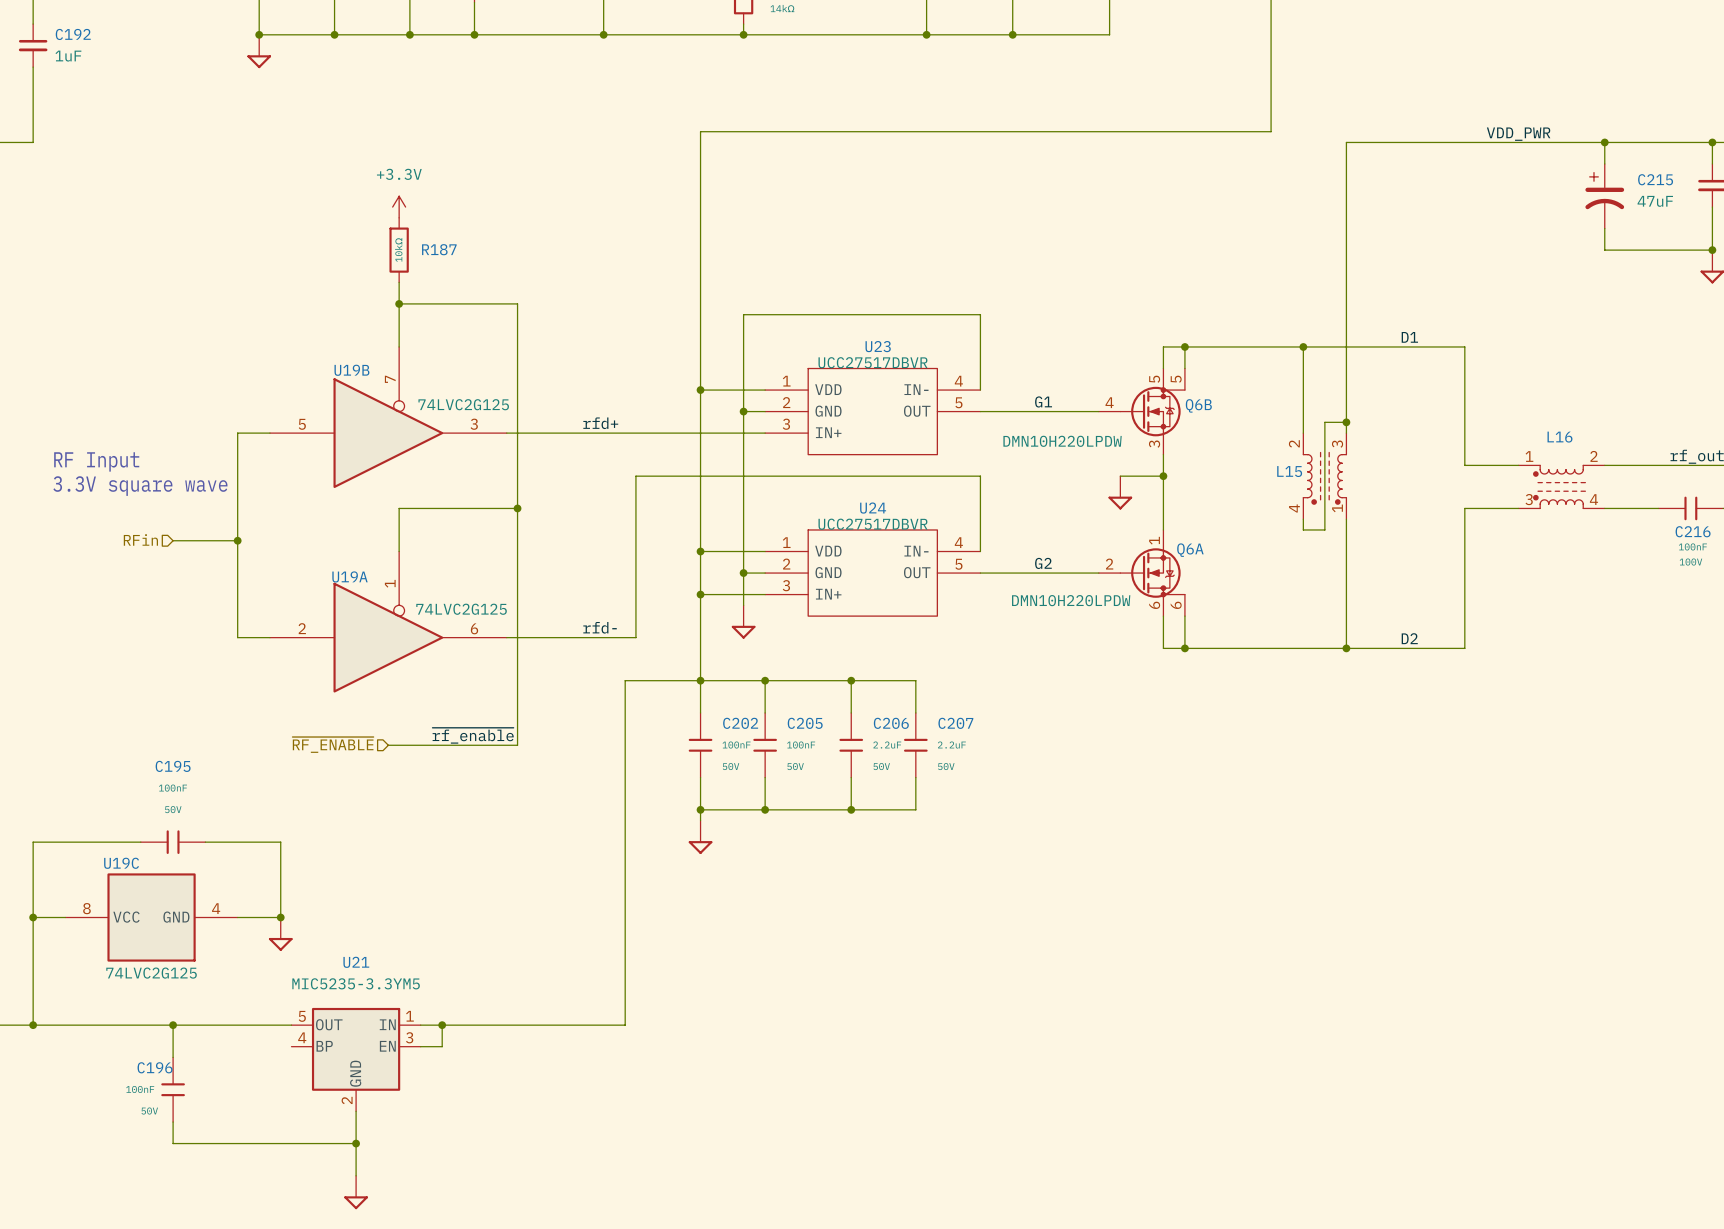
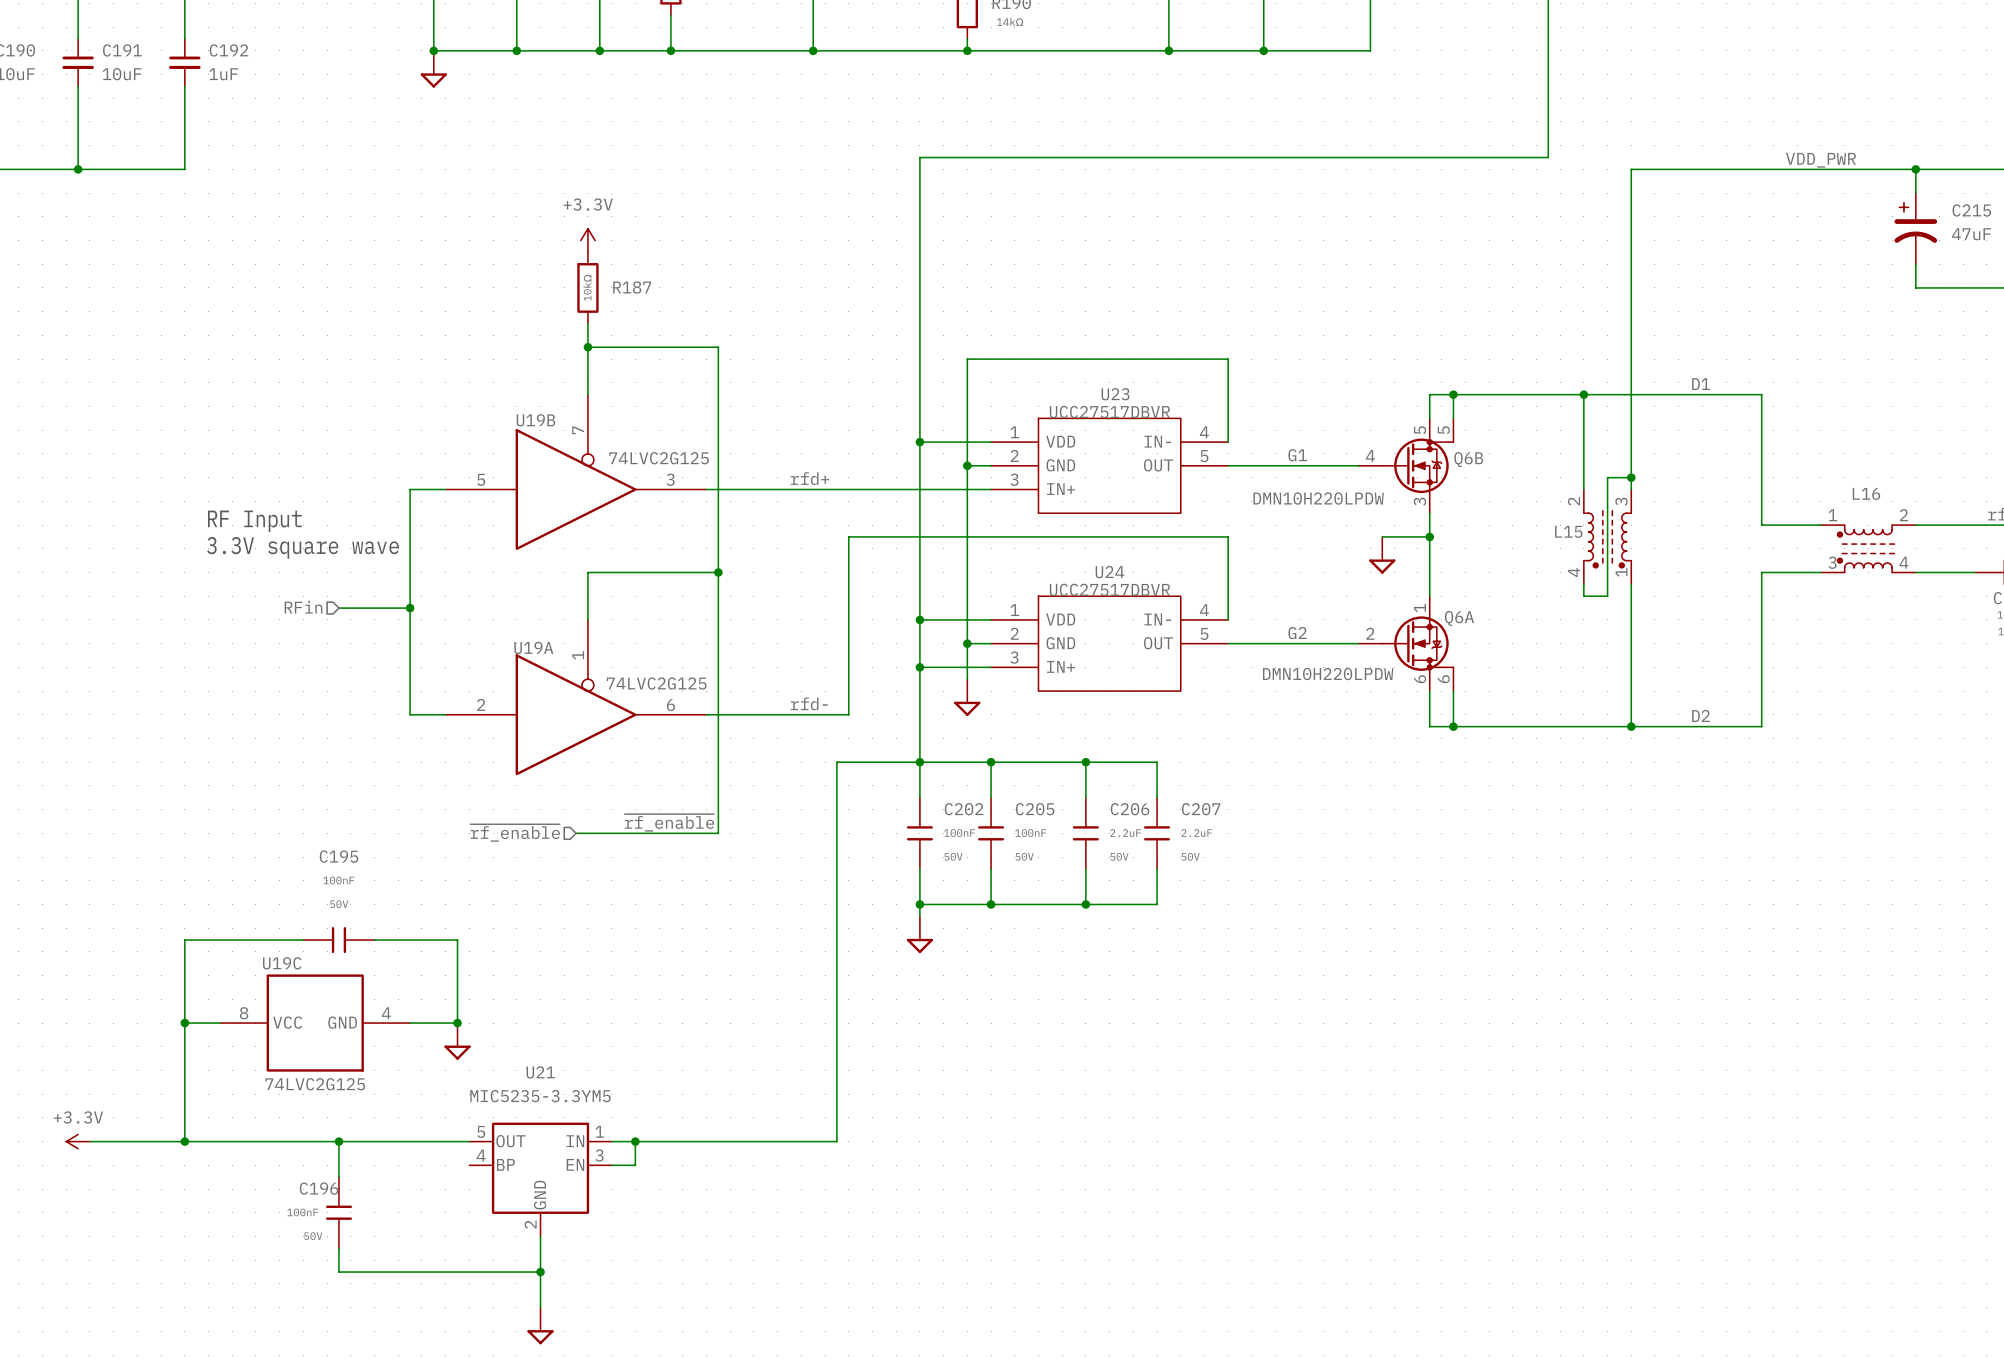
hierarchical label: ~{RF_ENABLE} (333, 744) -> ~{rf_enable} (515, 832)

